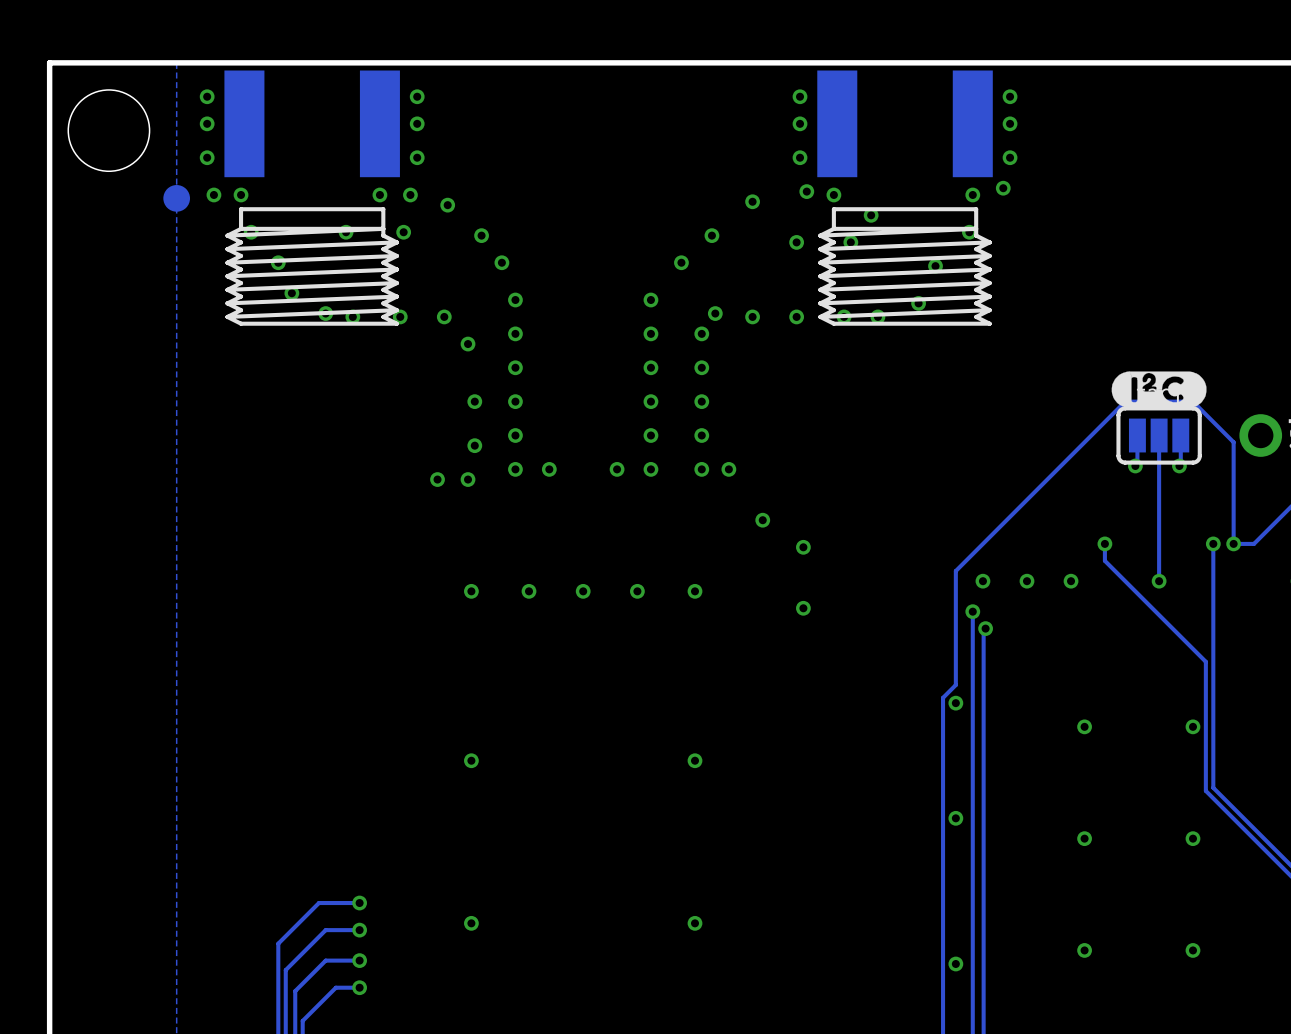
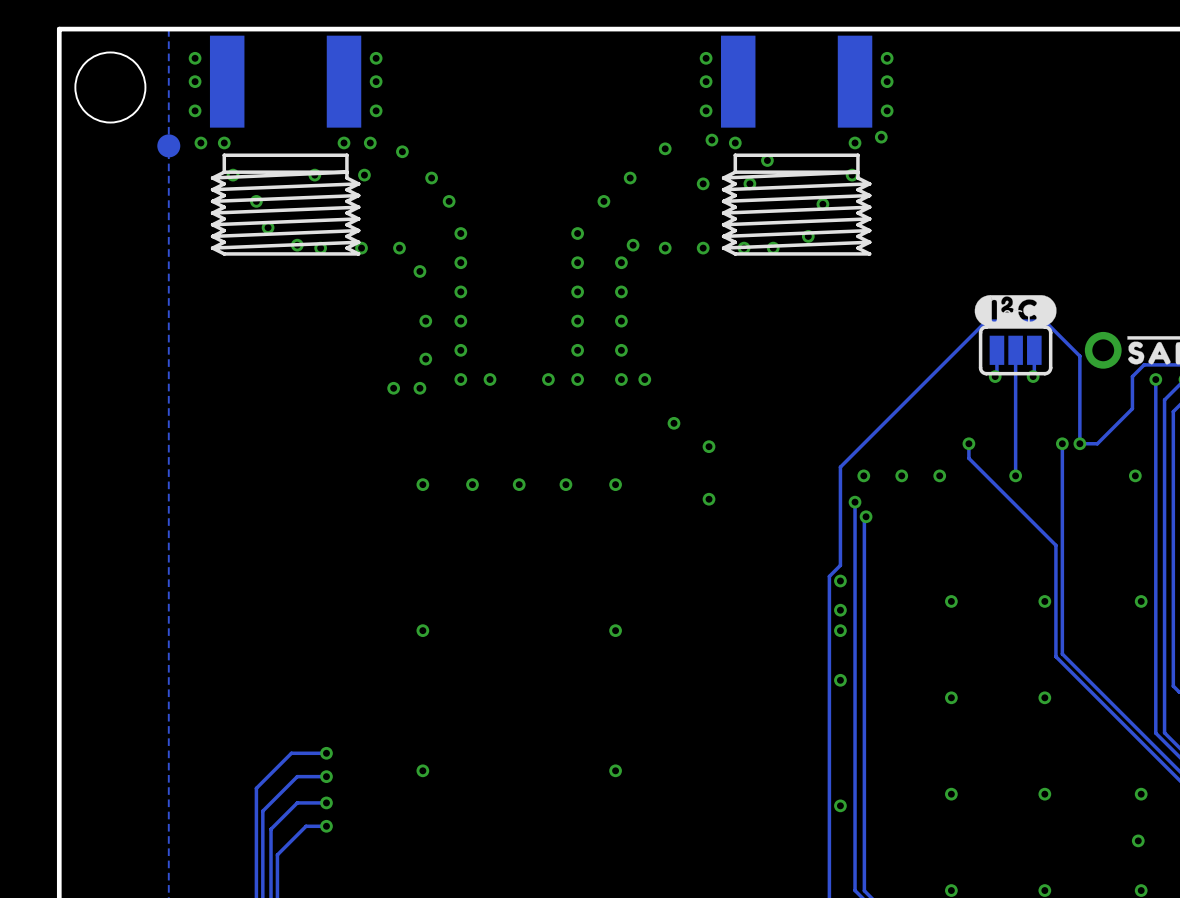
via: none -> (840, 610)
via: none -> (840, 630)

